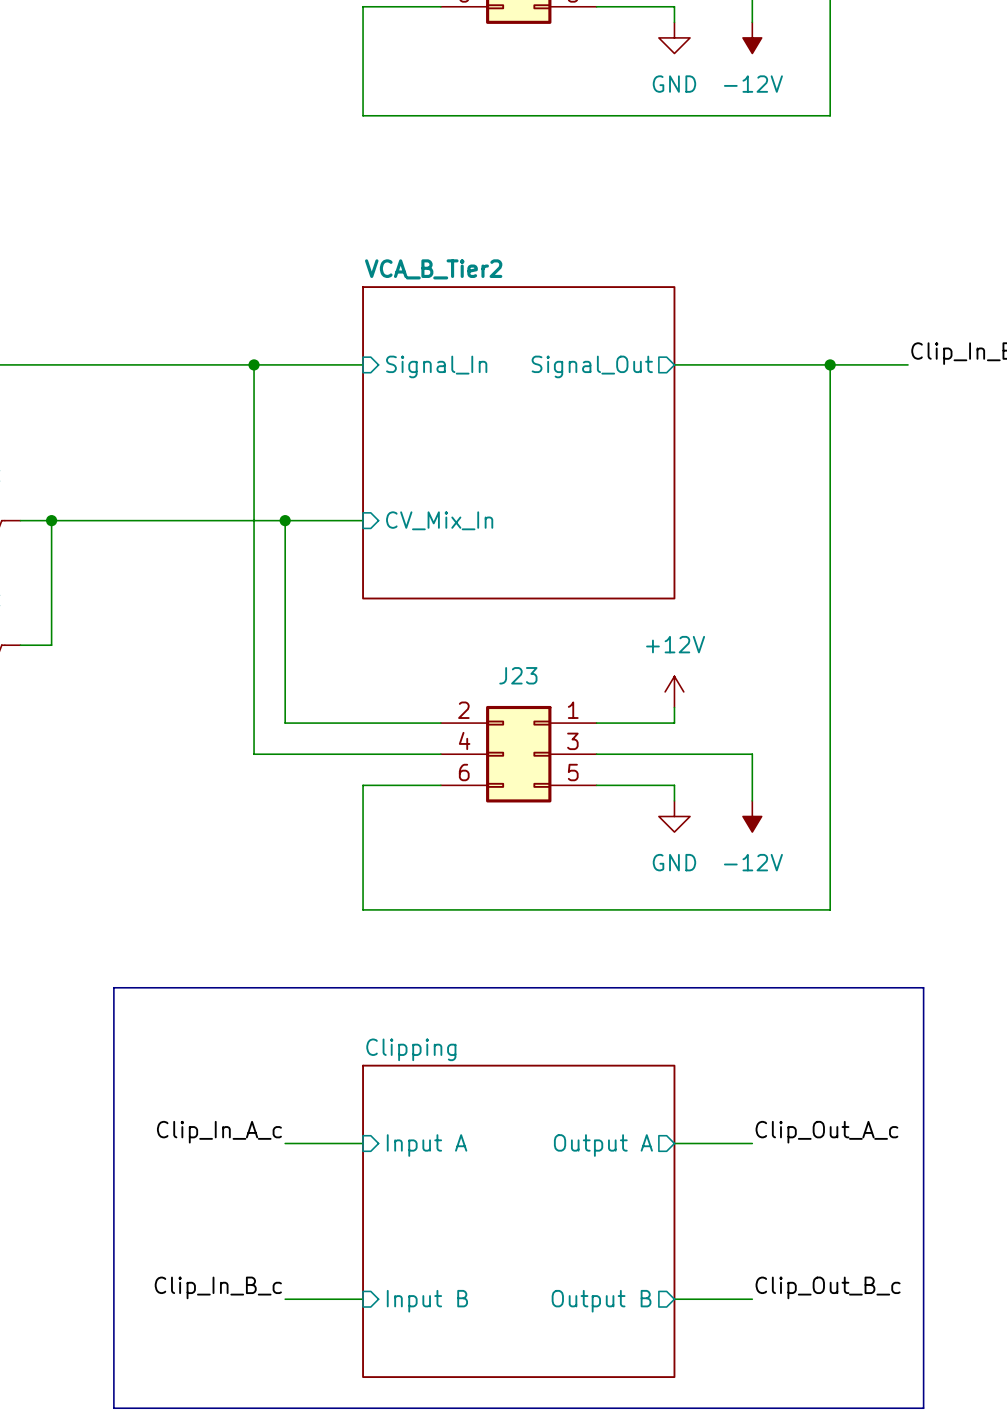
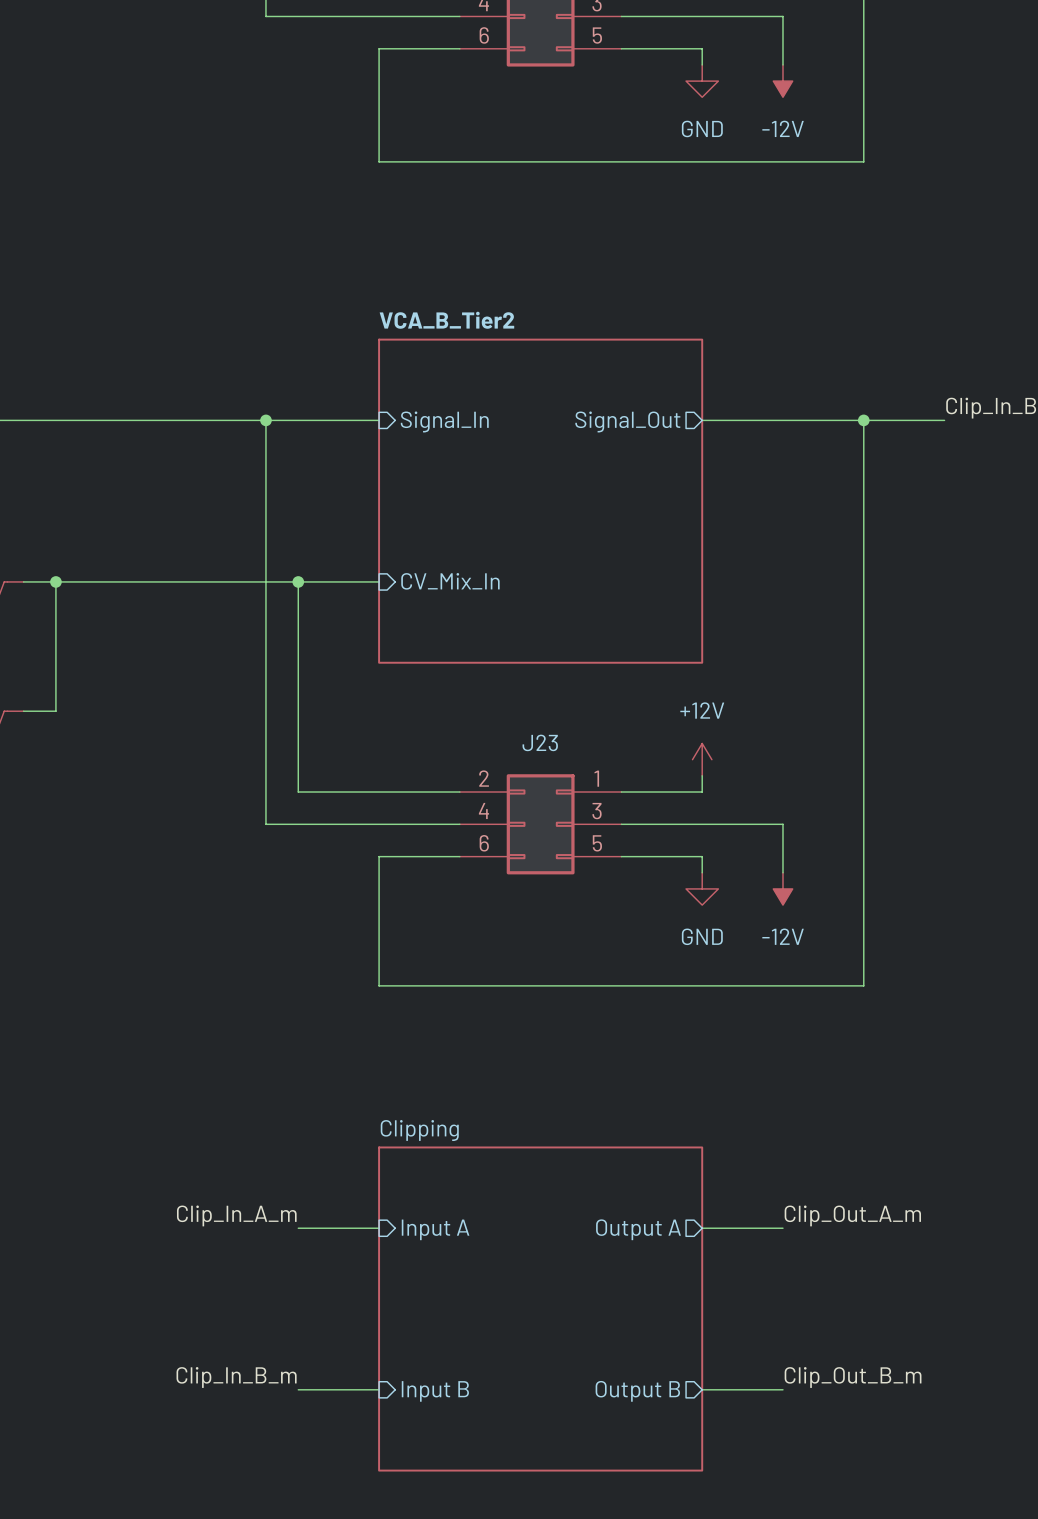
line: (113, 987) (923, 987) (923, 1408) (113, 1408) (113, 987) -> none
label: Clip_In_A_c (219, 1132) -> Clip_In_A_m (236, 1215)
label: Clip_Out_A_c (826, 1132) -> Clip_Out_A_m (852, 1215)
label: Clip_In_B_c (218, 1287) -> Clip_In_B_m (236, 1377)
label: Clip_Out_B_c (828, 1287) -> Clip_Out_B_m (853, 1377)

